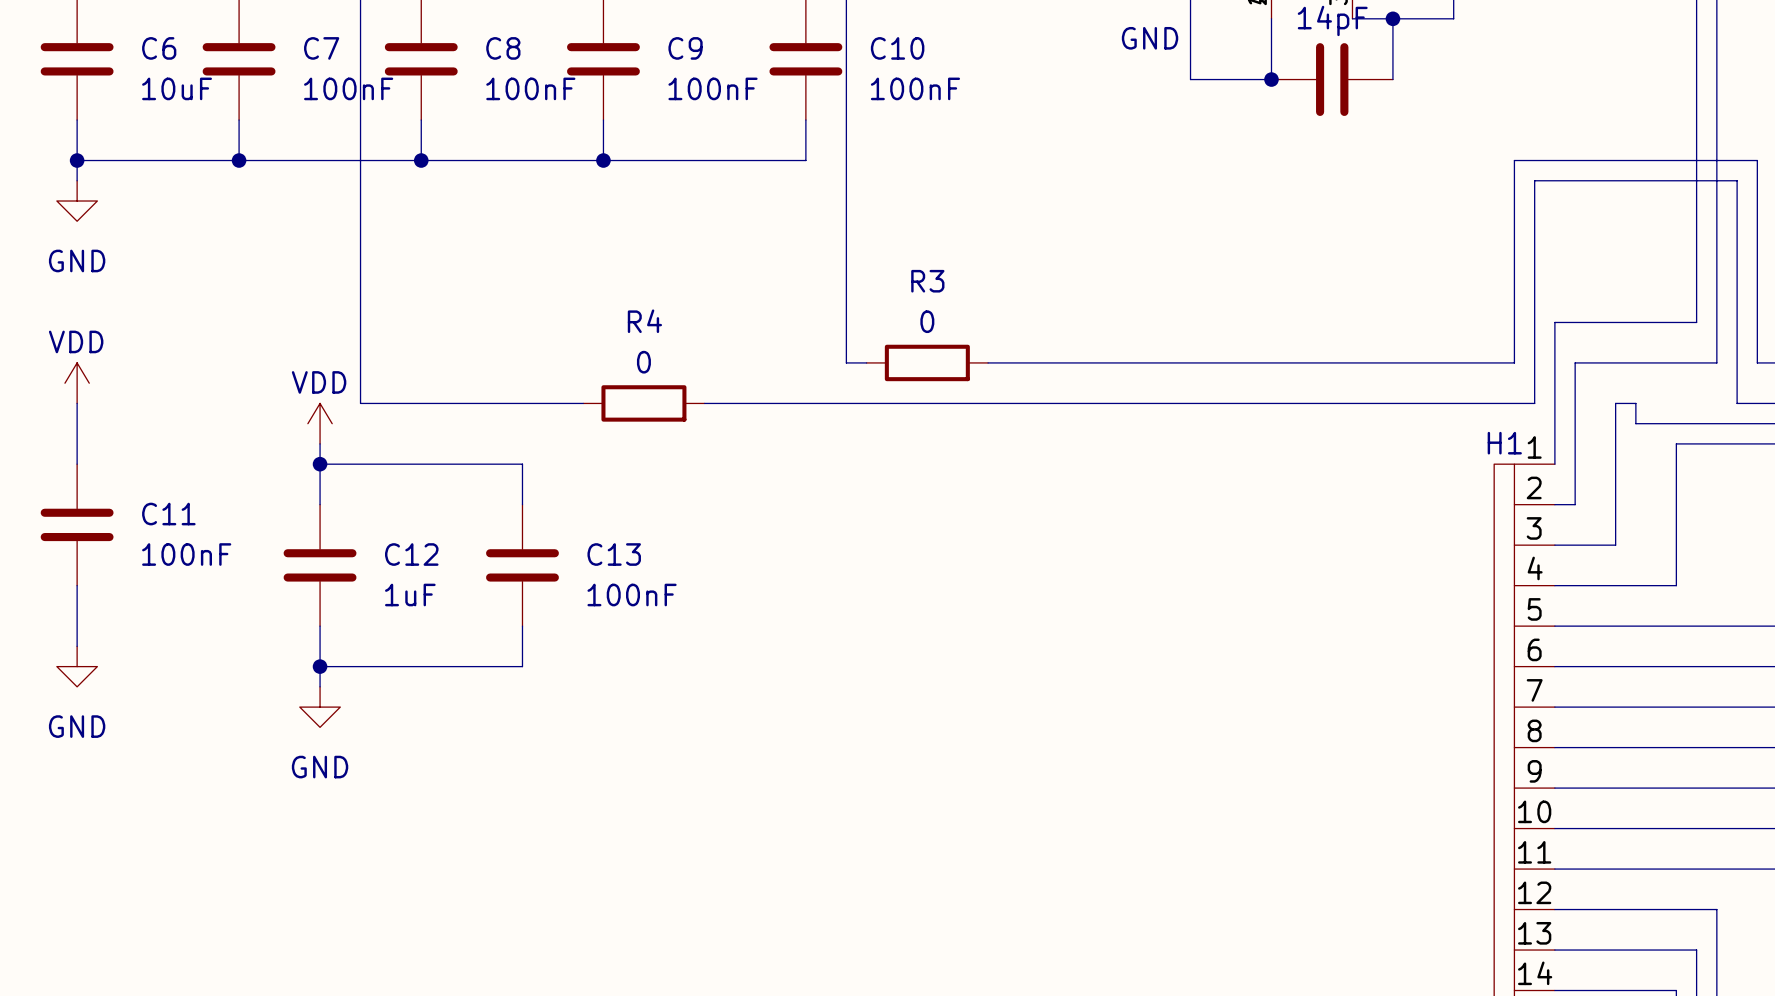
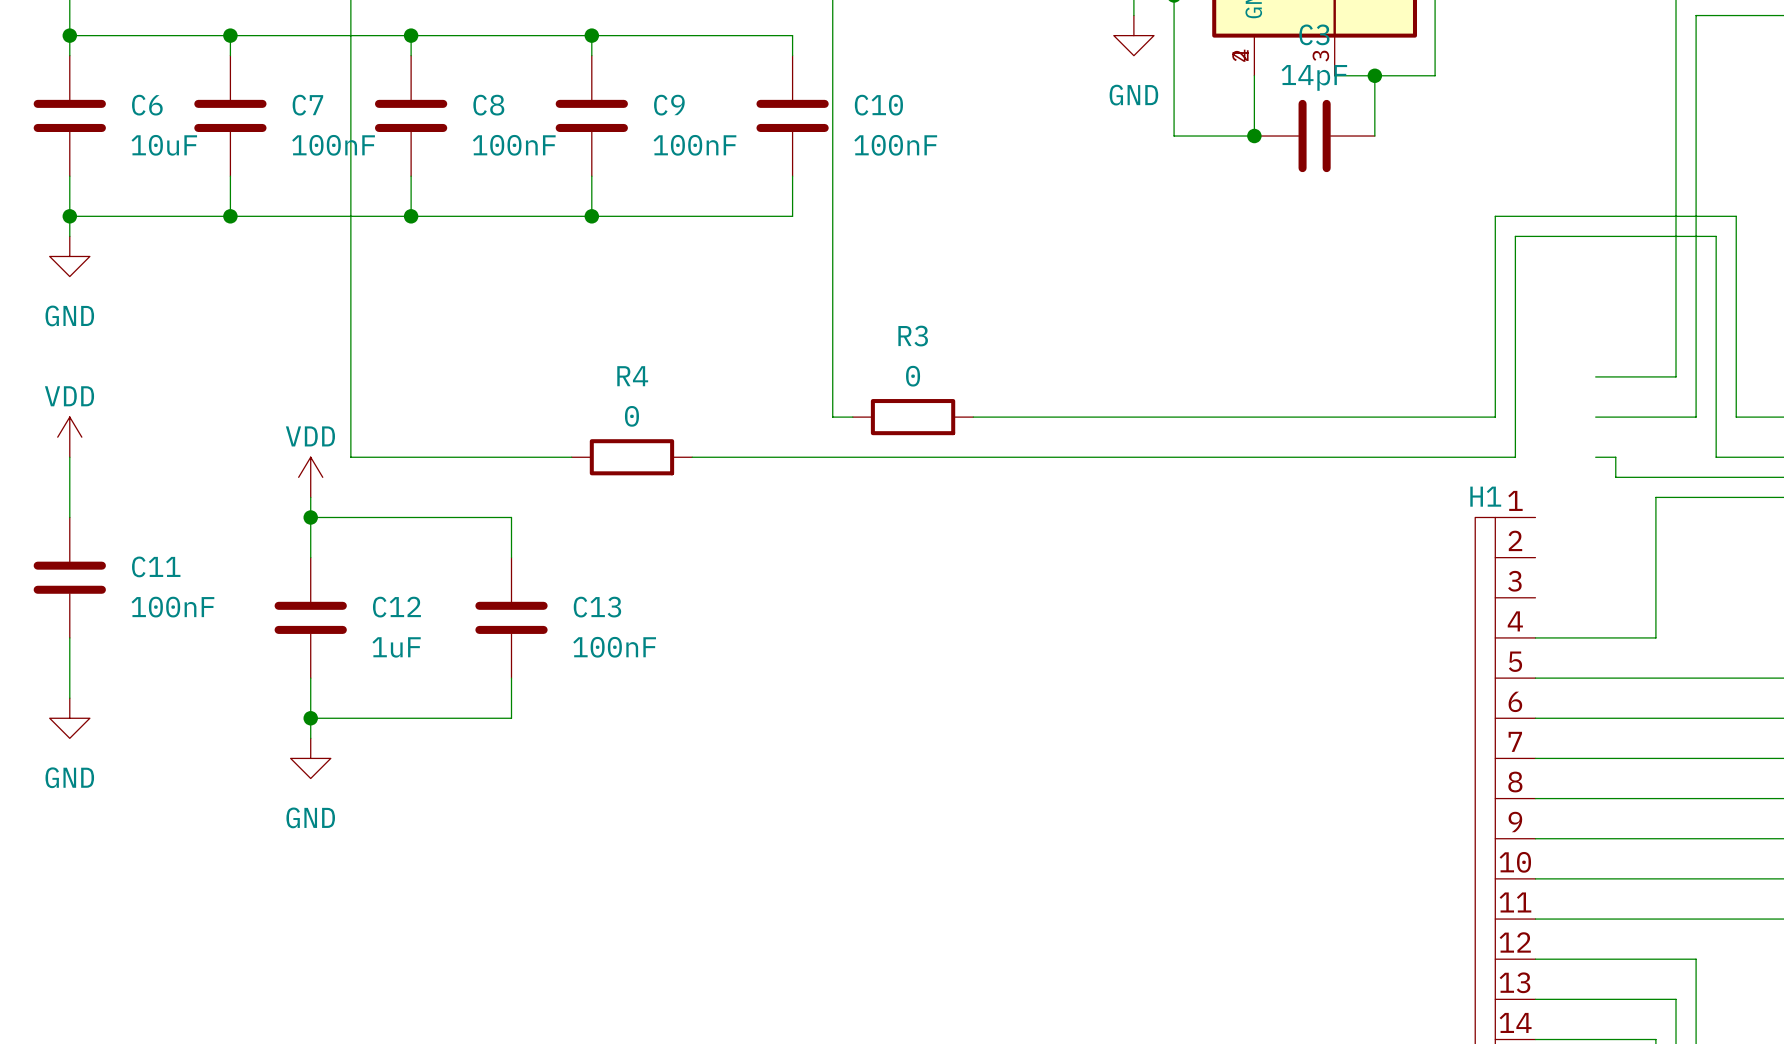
wire: (1615, 322) (1554, 322) (1554, 464) -> none
wire: (1615, 362) (1575, 362) (1575, 504) (1554, 504) -> none
wire: (1615, 403) (1615, 545) (1554, 545) -> none

